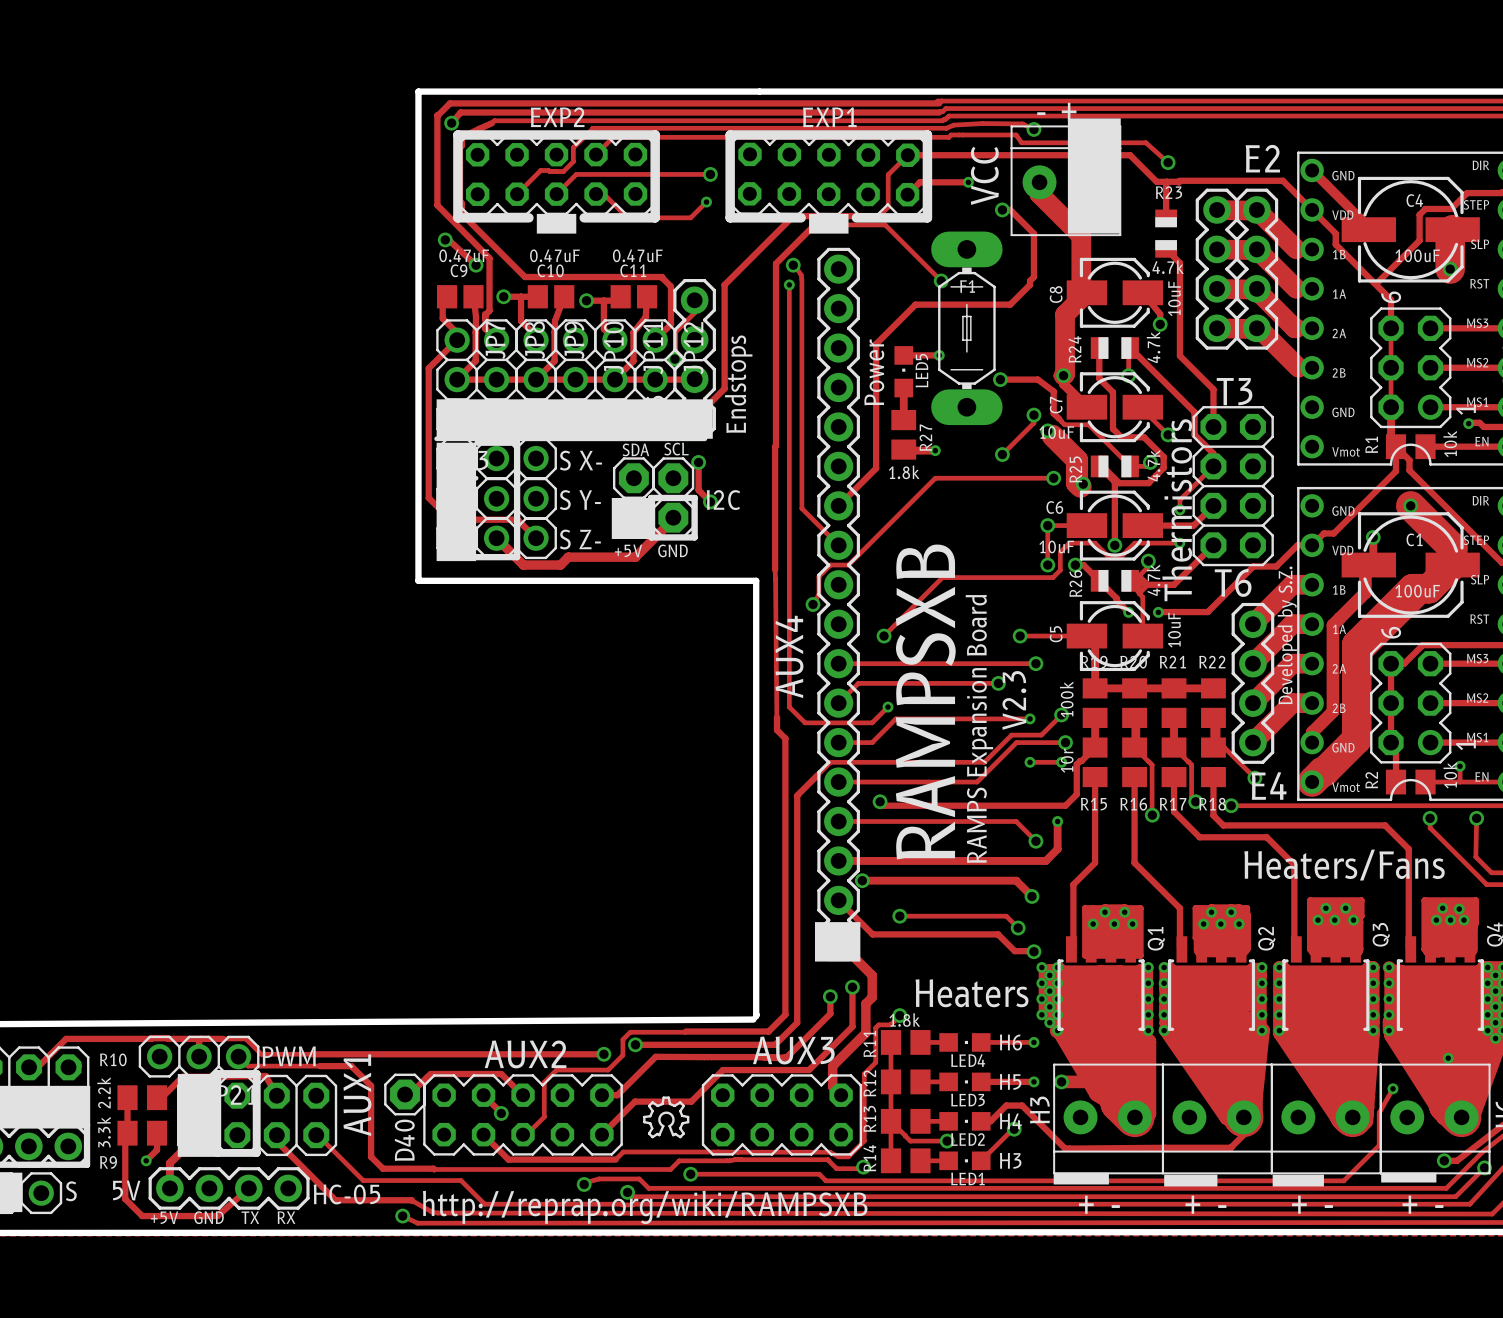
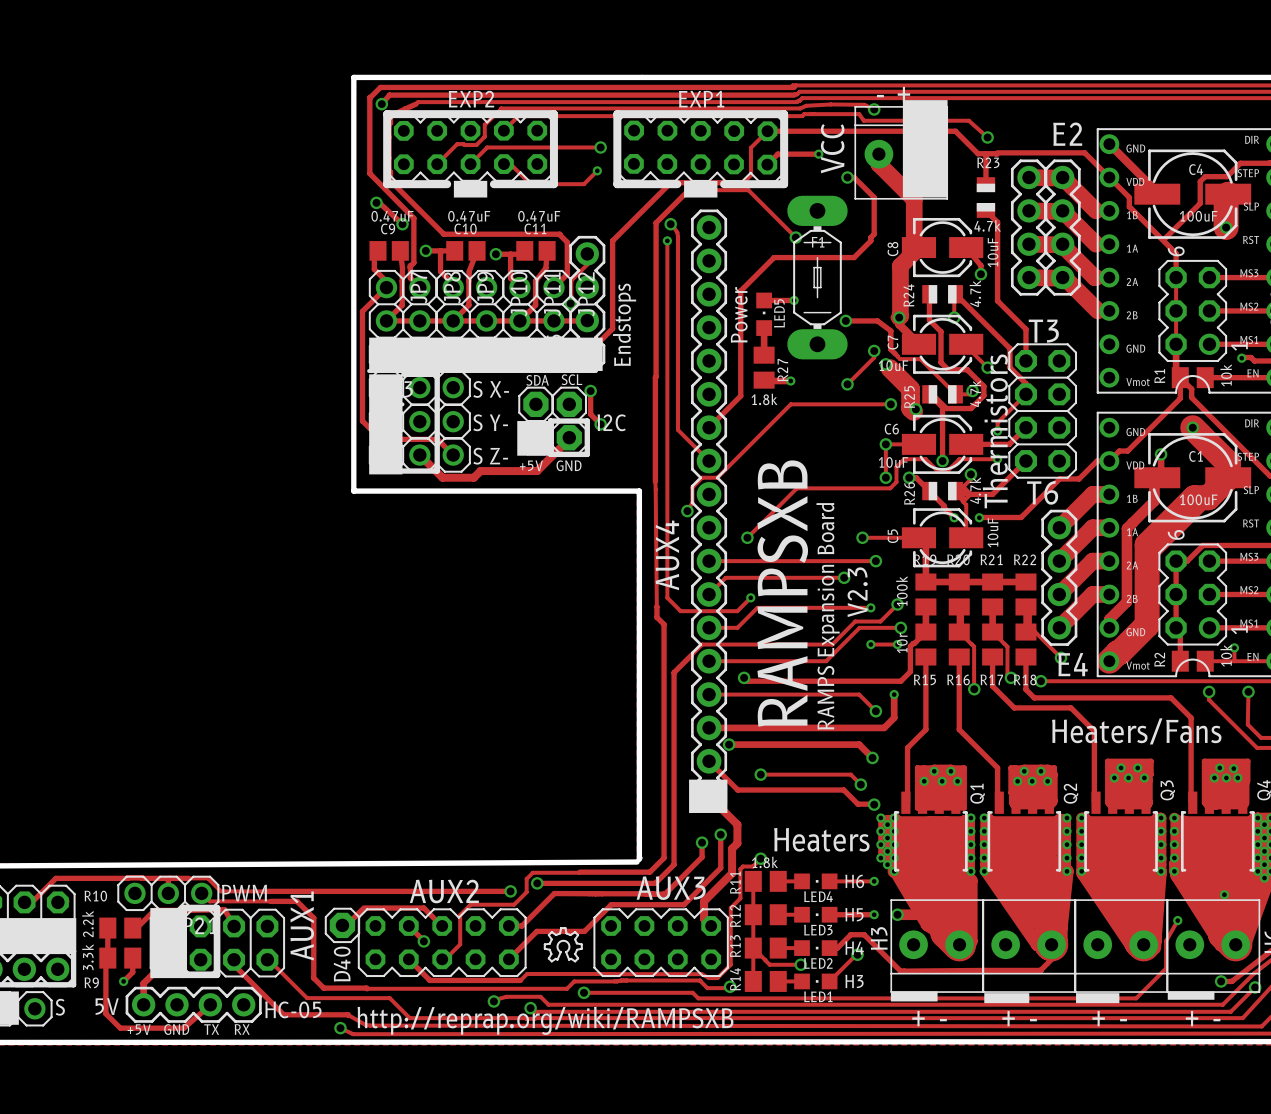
text: Developed by S.Z. (1287, 635) -> none

